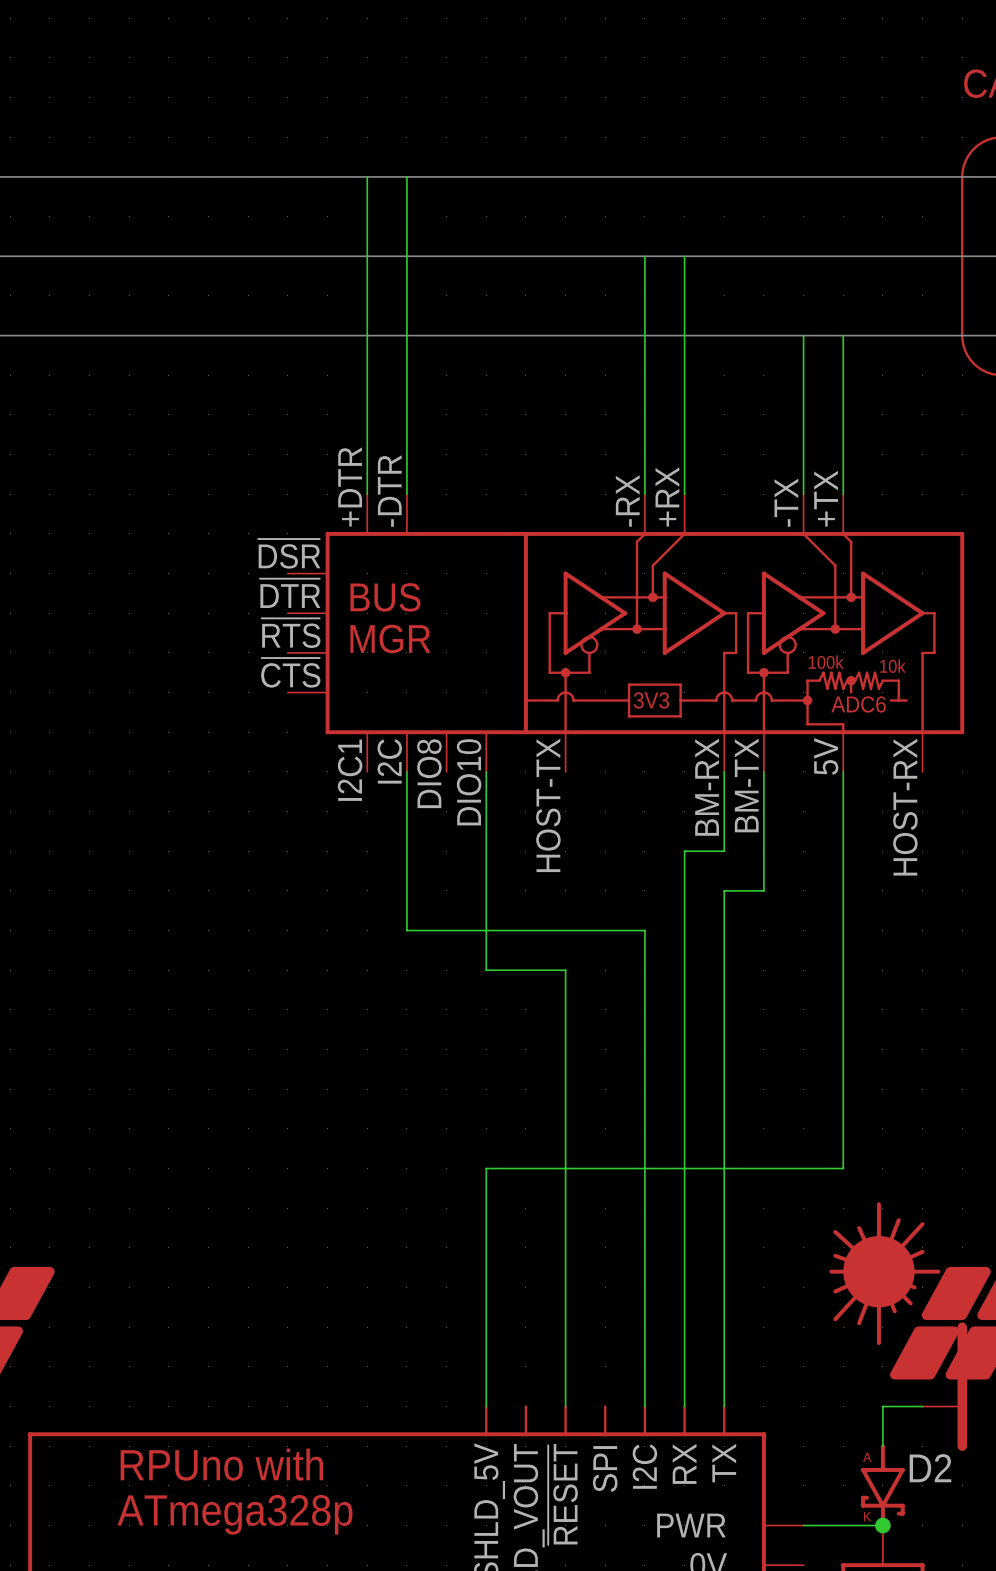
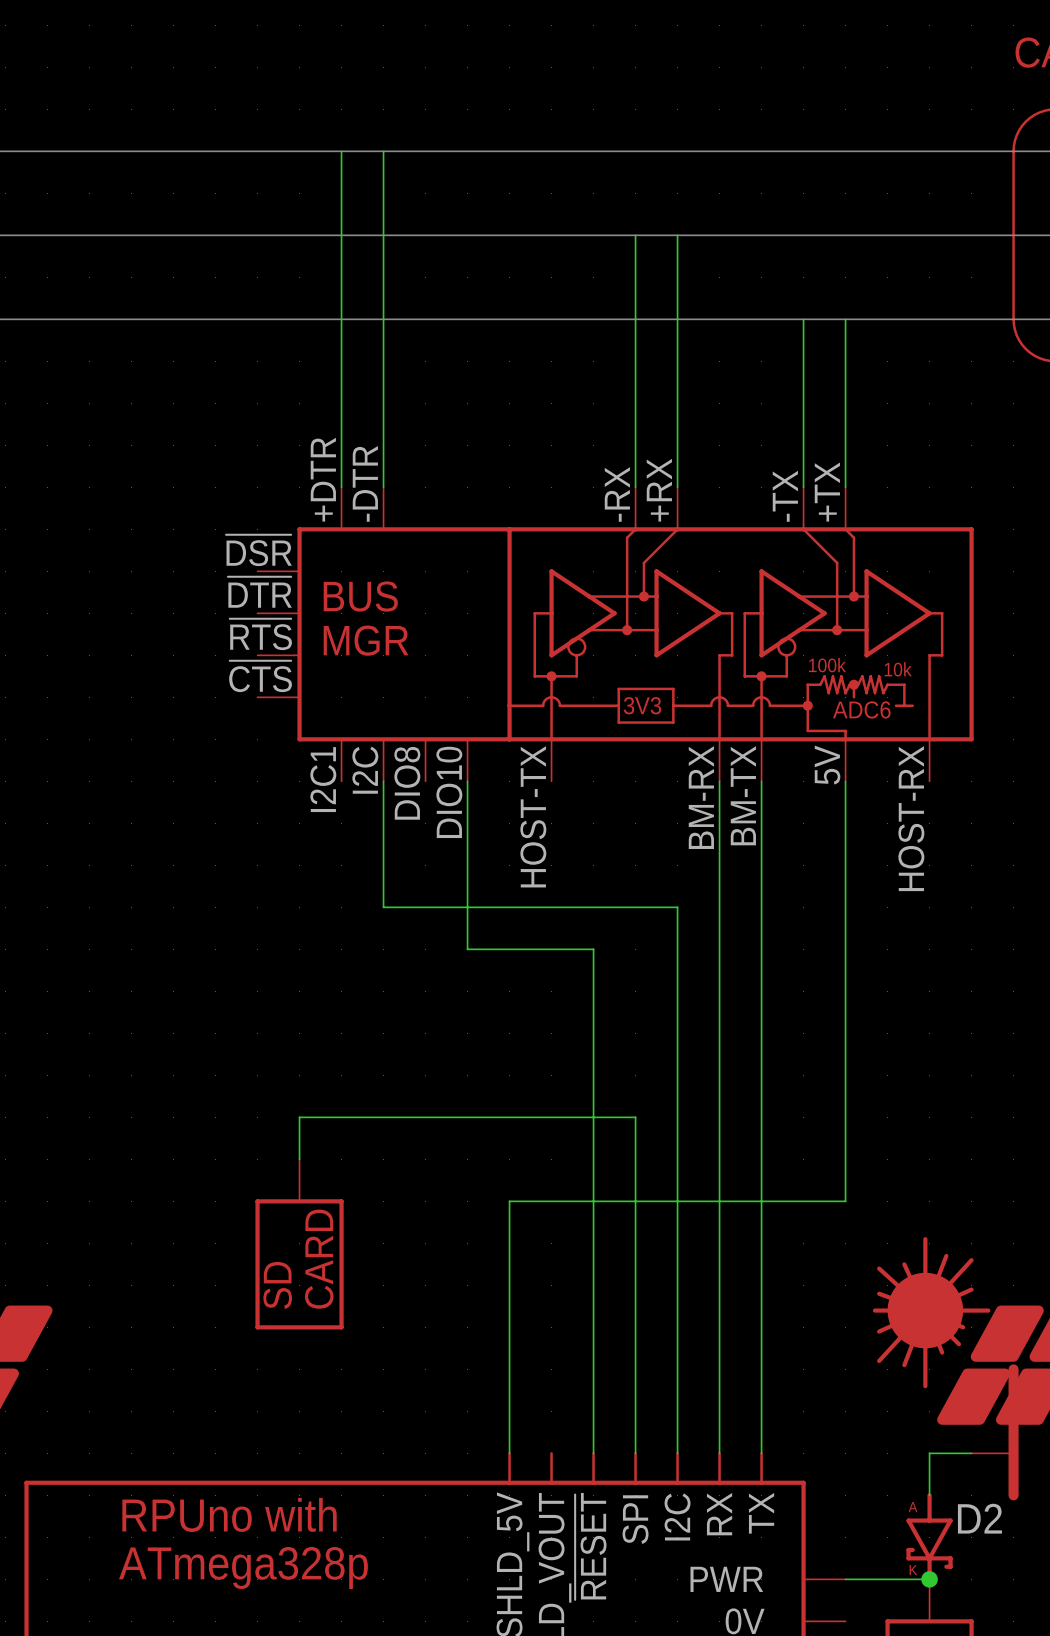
wire: (406, 176) (406, 494) -> (341, 151) (341, 487)
wire: (684, 256) (684, 494) -> (635, 235) (635, 487)
wire: (843, 335) (843, 494) -> (803, 319) (803, 487)
part position: (626, 633) -> (615, 634)
wire: none -> (383, 781) (383, 907) (677, 907) (677, 949)
wire: (406, 771) (406, 930) (446, 930) -> (467, 781) (467, 949)
wire: (486, 771) (486, 970) (565, 970) -> none
wire: none -> (719, 781) (719, 865)
wire: (763, 771) (763, 890) (724, 890) -> none
wire: (843, 771) (843, 1168) (803, 1168) -> (845, 781) (845, 1201)
wire: (684, 851) (724, 851) -> (761, 907) (761, 865)
wire: (565, 930) (644, 930) -> (593, 949) (593, 991)
wire: none -> (299, 1159) (299, 1117) (635, 1117) (635, 1453)
part: none -> (299, 1244)

